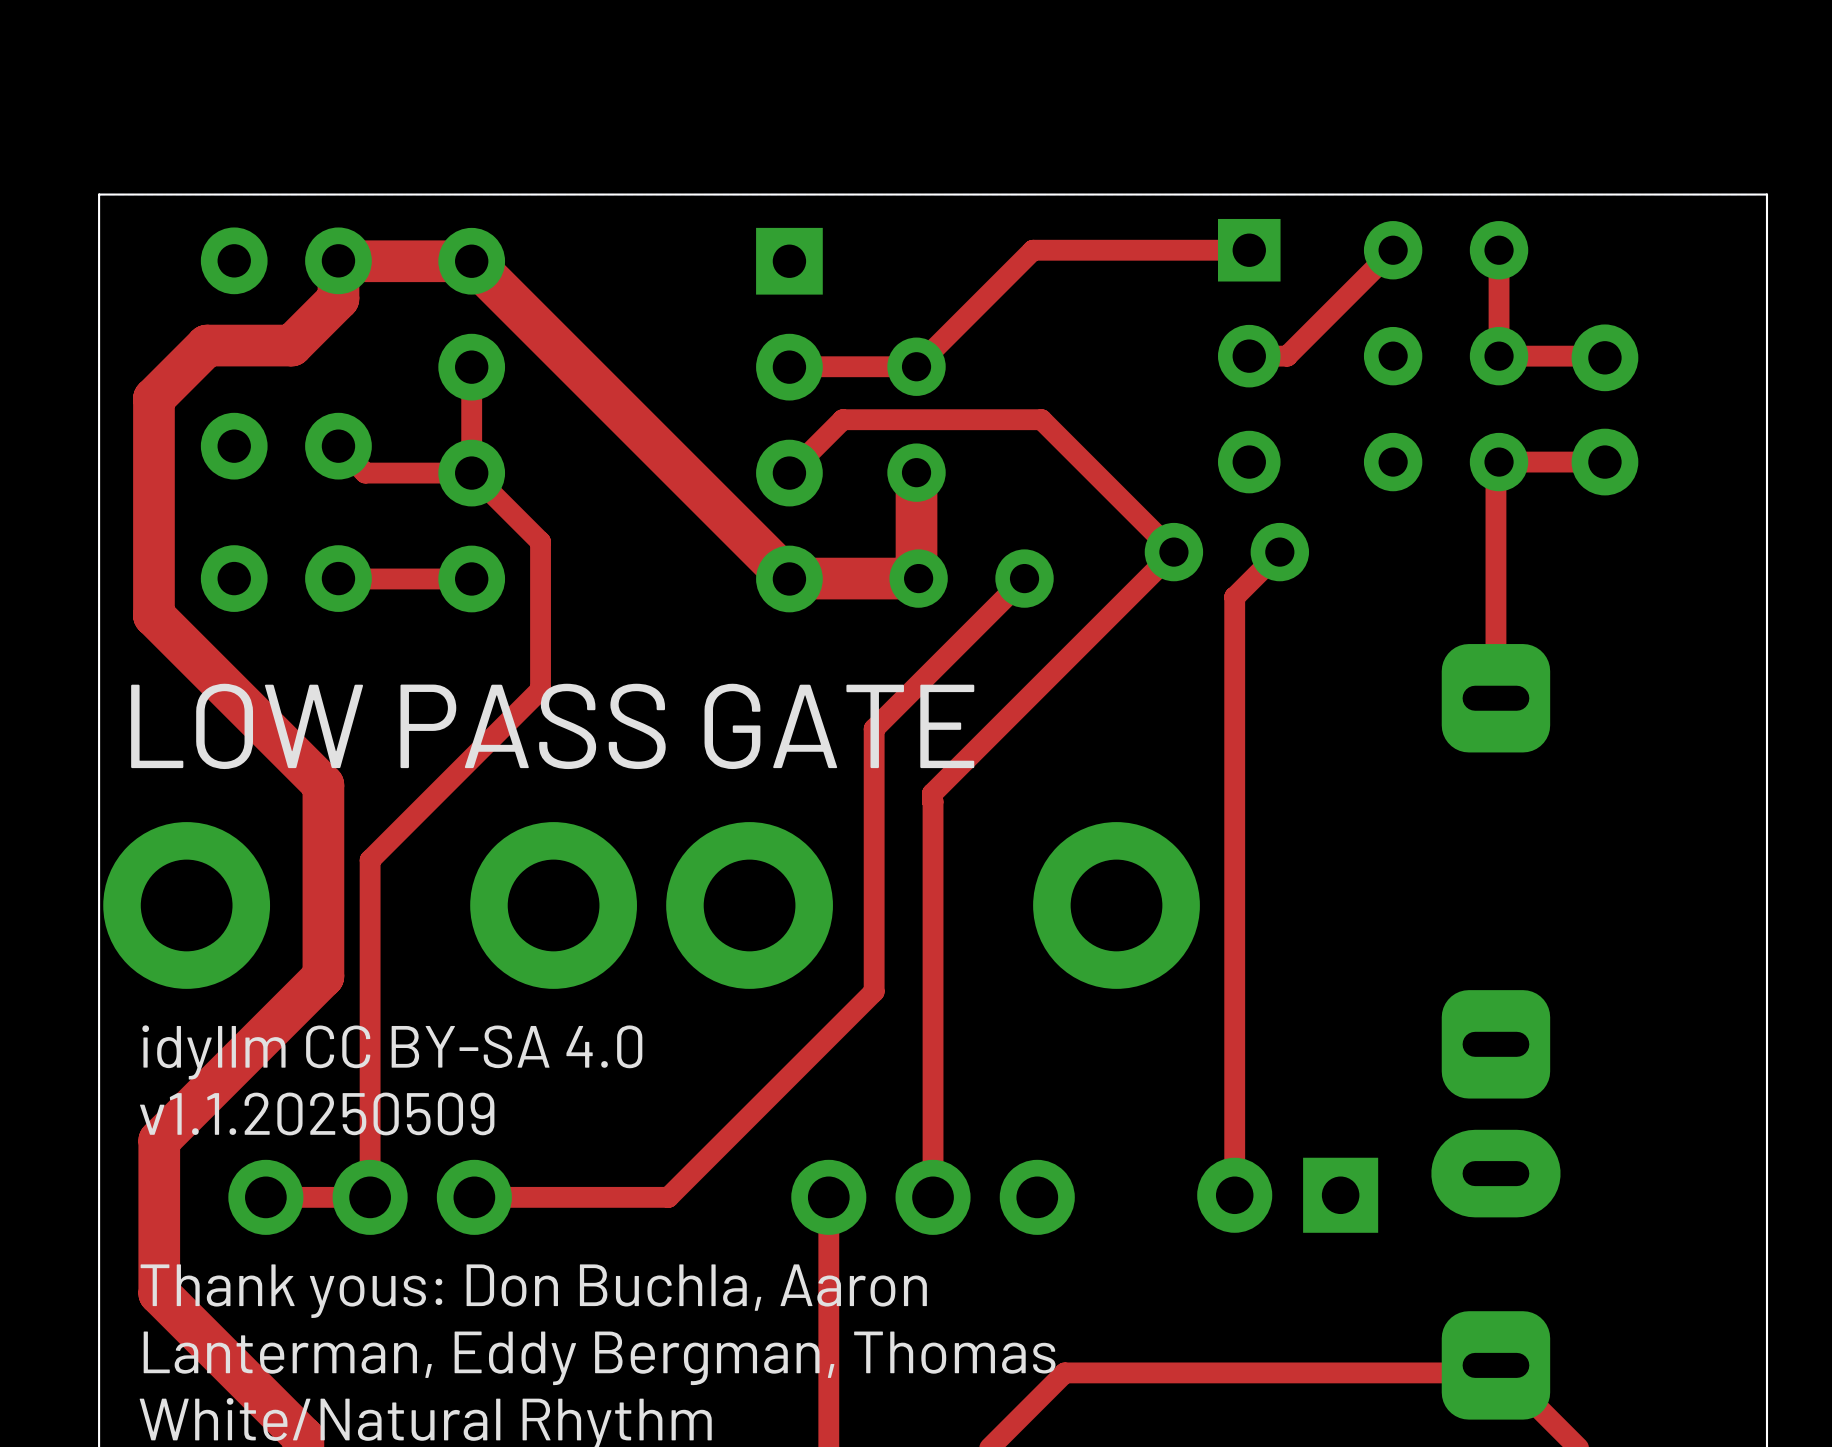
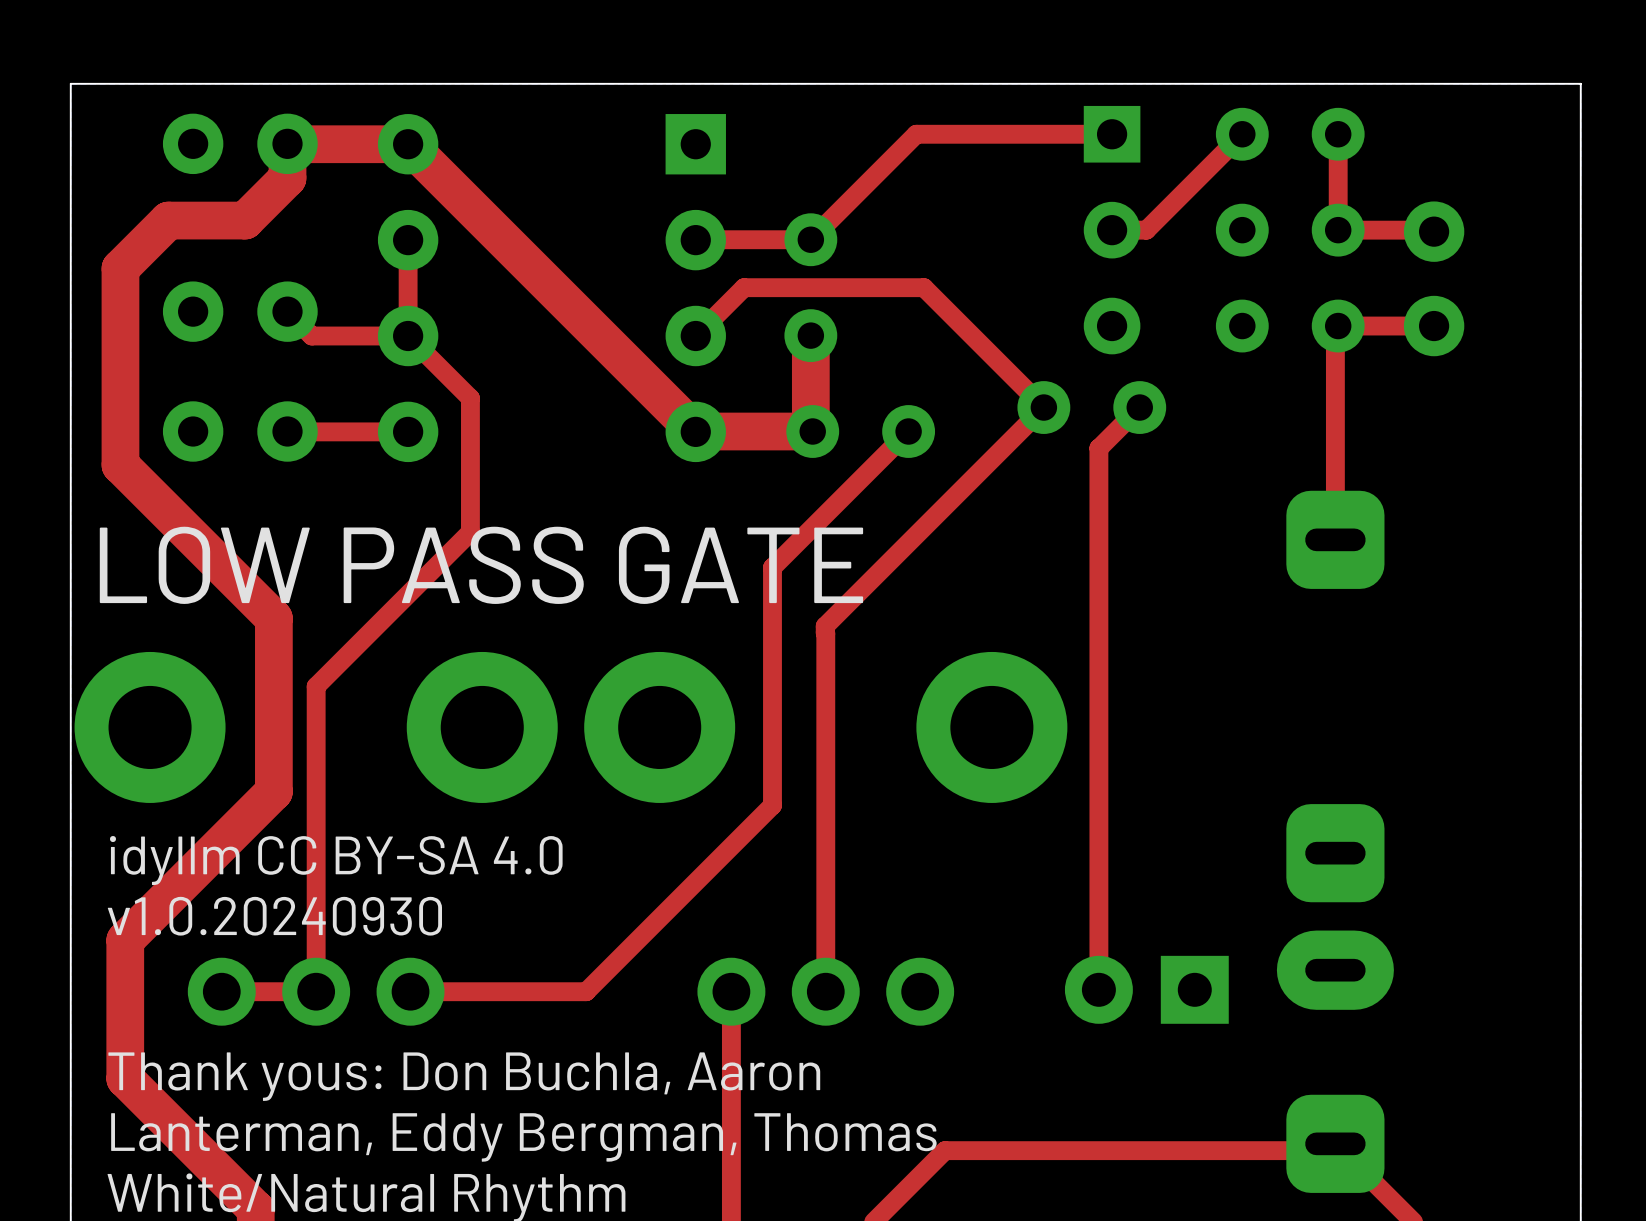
text: v1.1.20250509 (317, 1113) -> v1.0.20240930 (274, 916)

